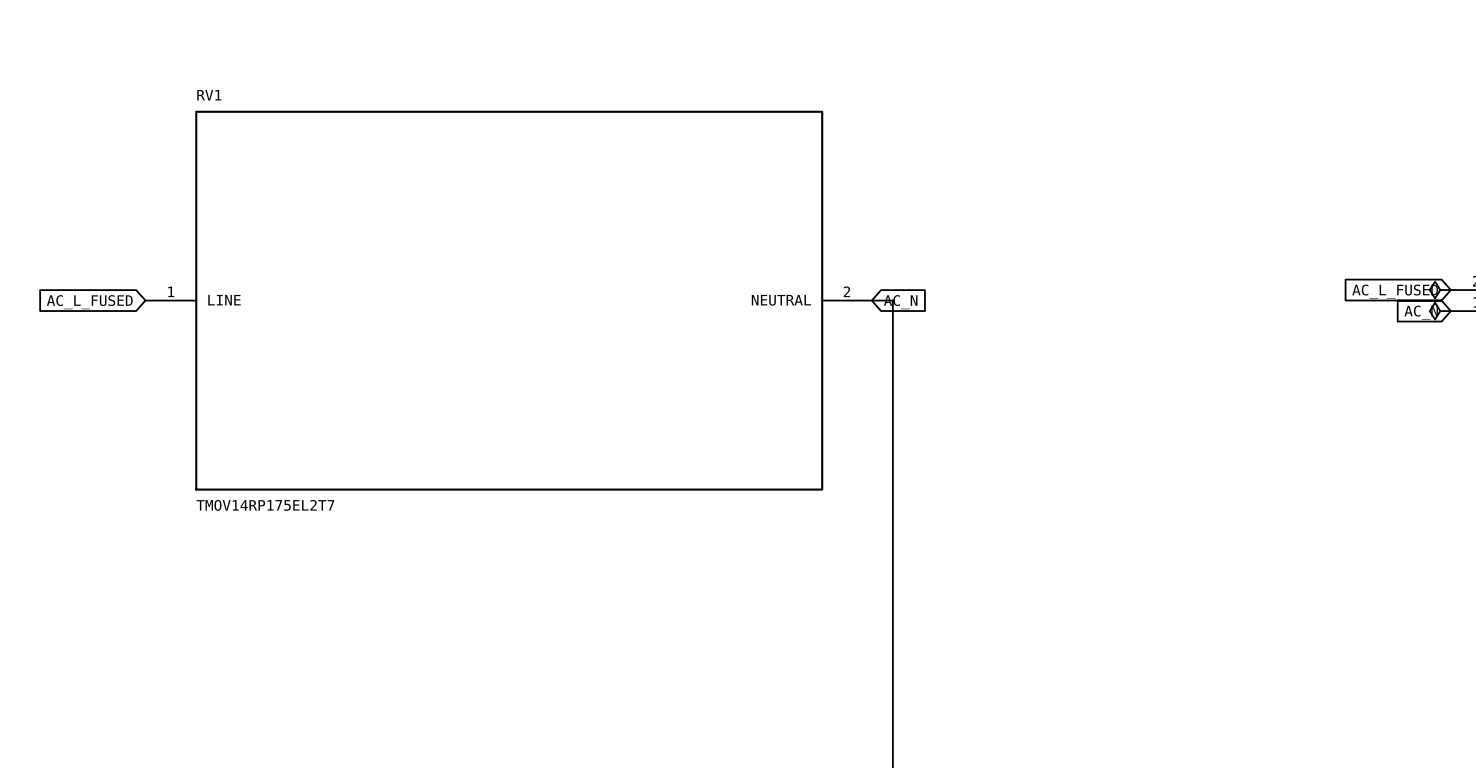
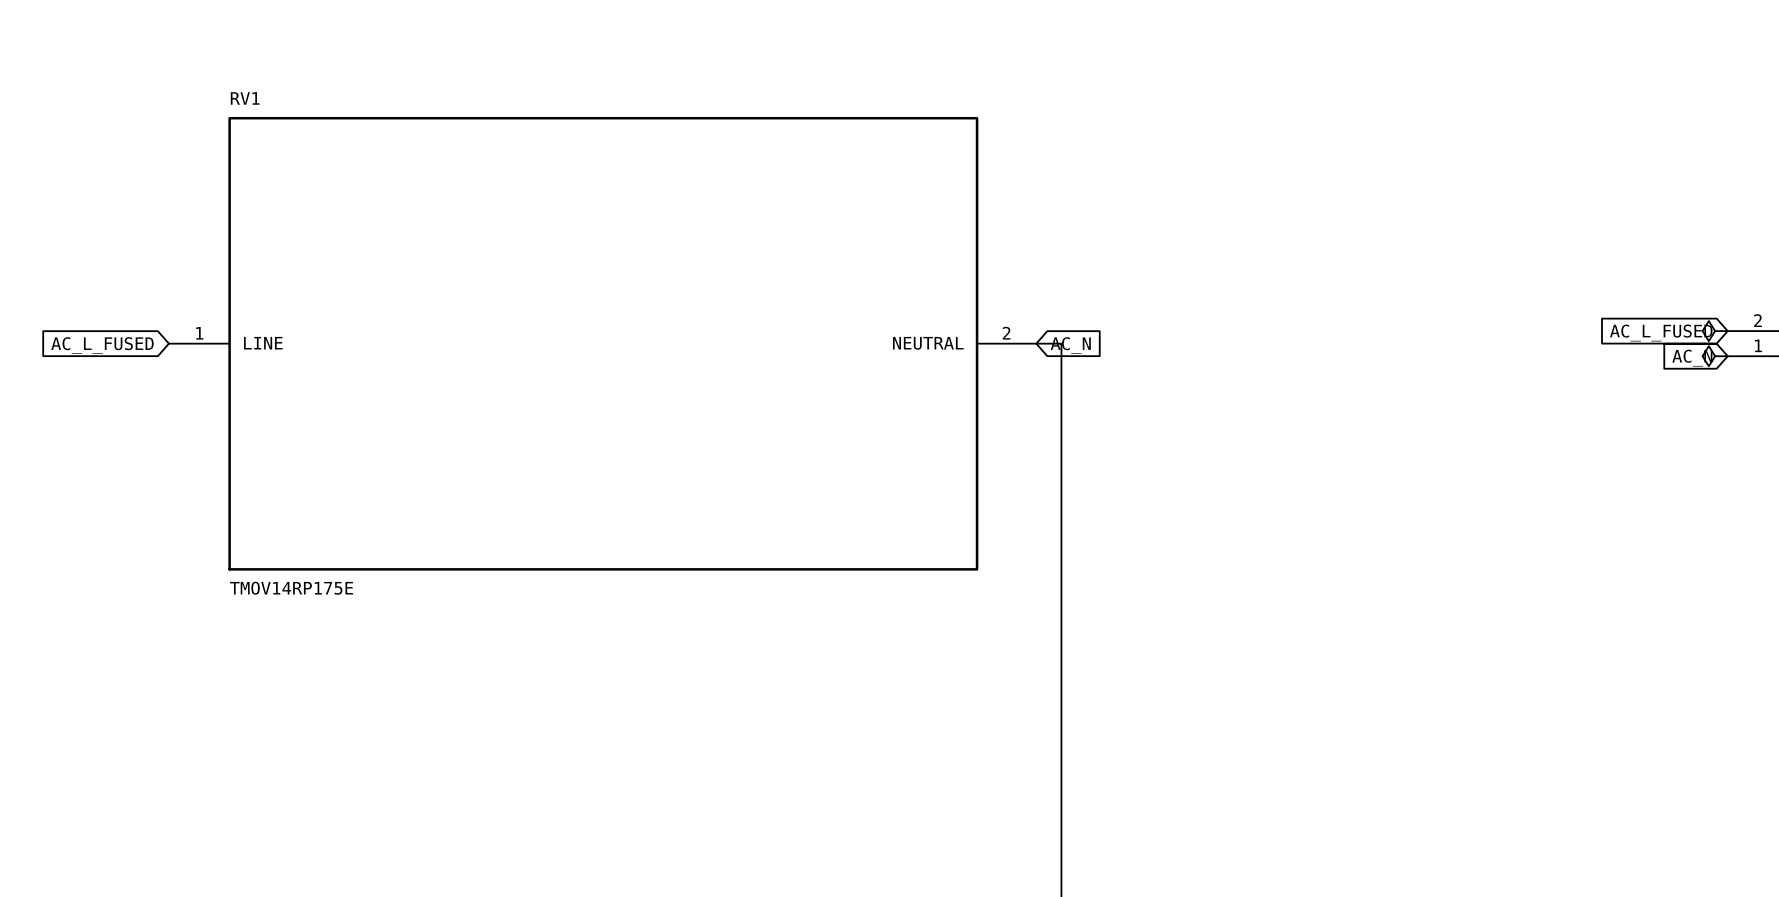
RV1 value: TMOV14RP175EL2T7 (265, 505) -> TMOV14RP175E (291, 588)

